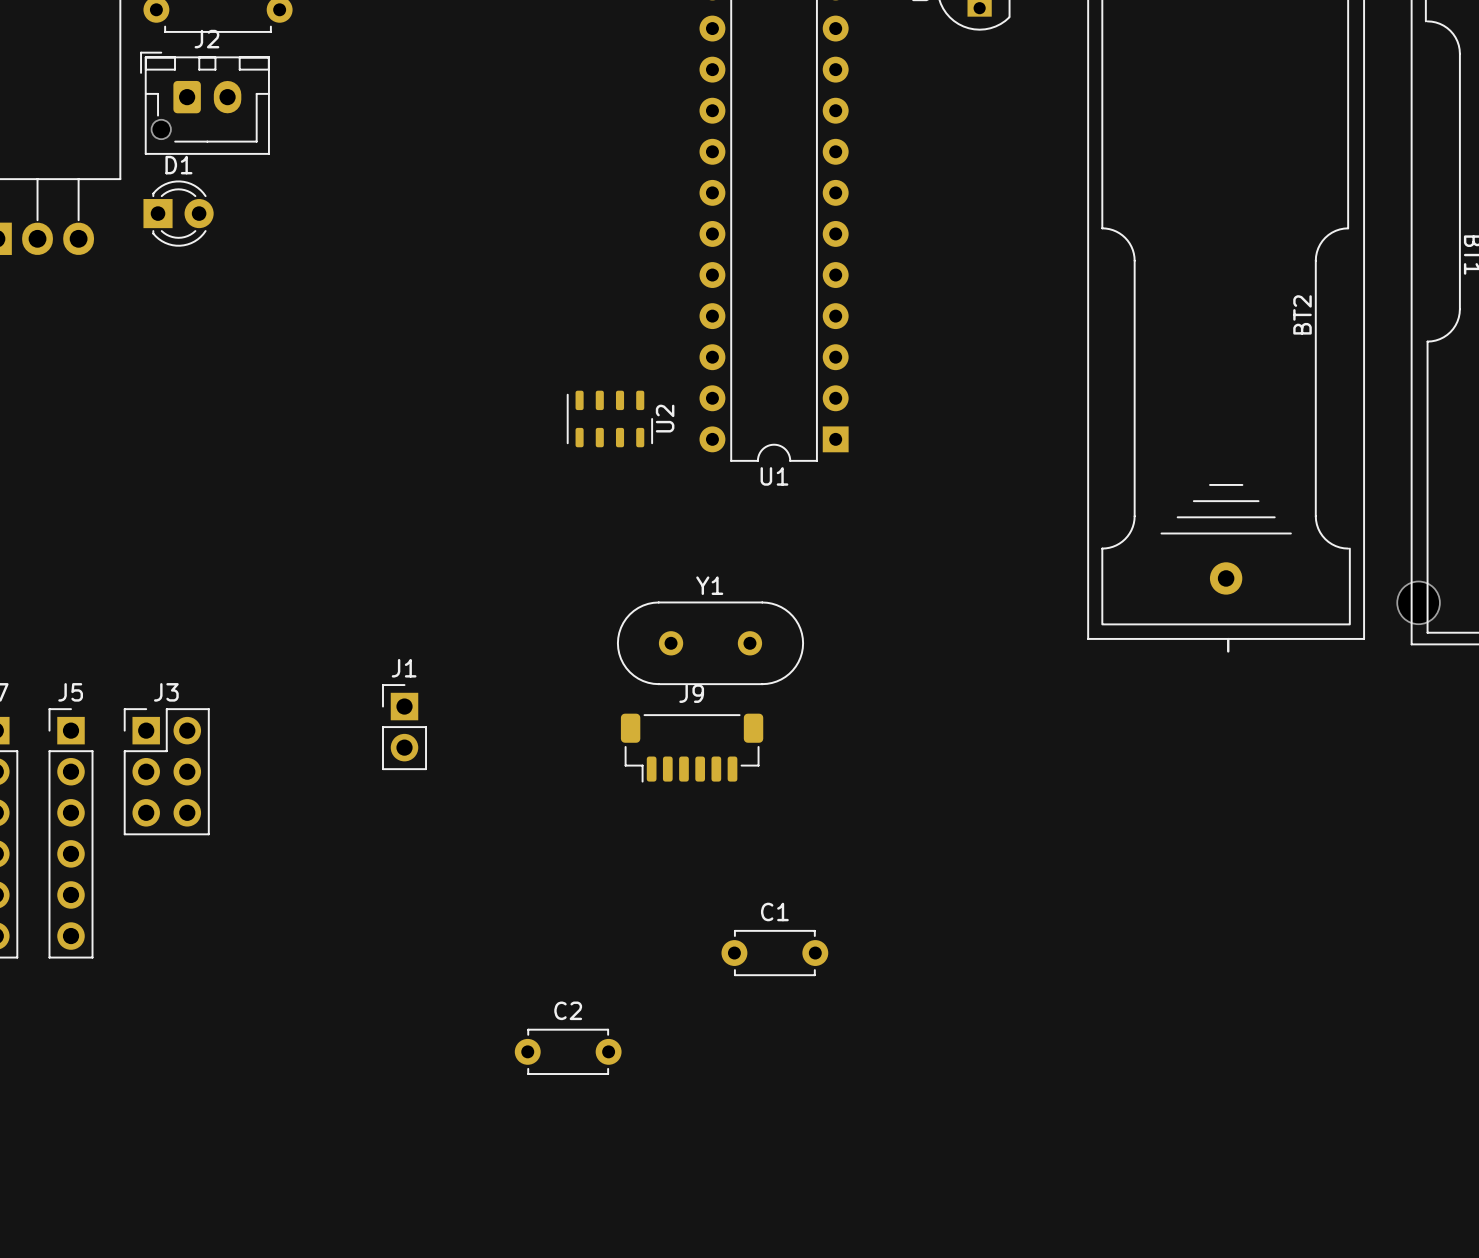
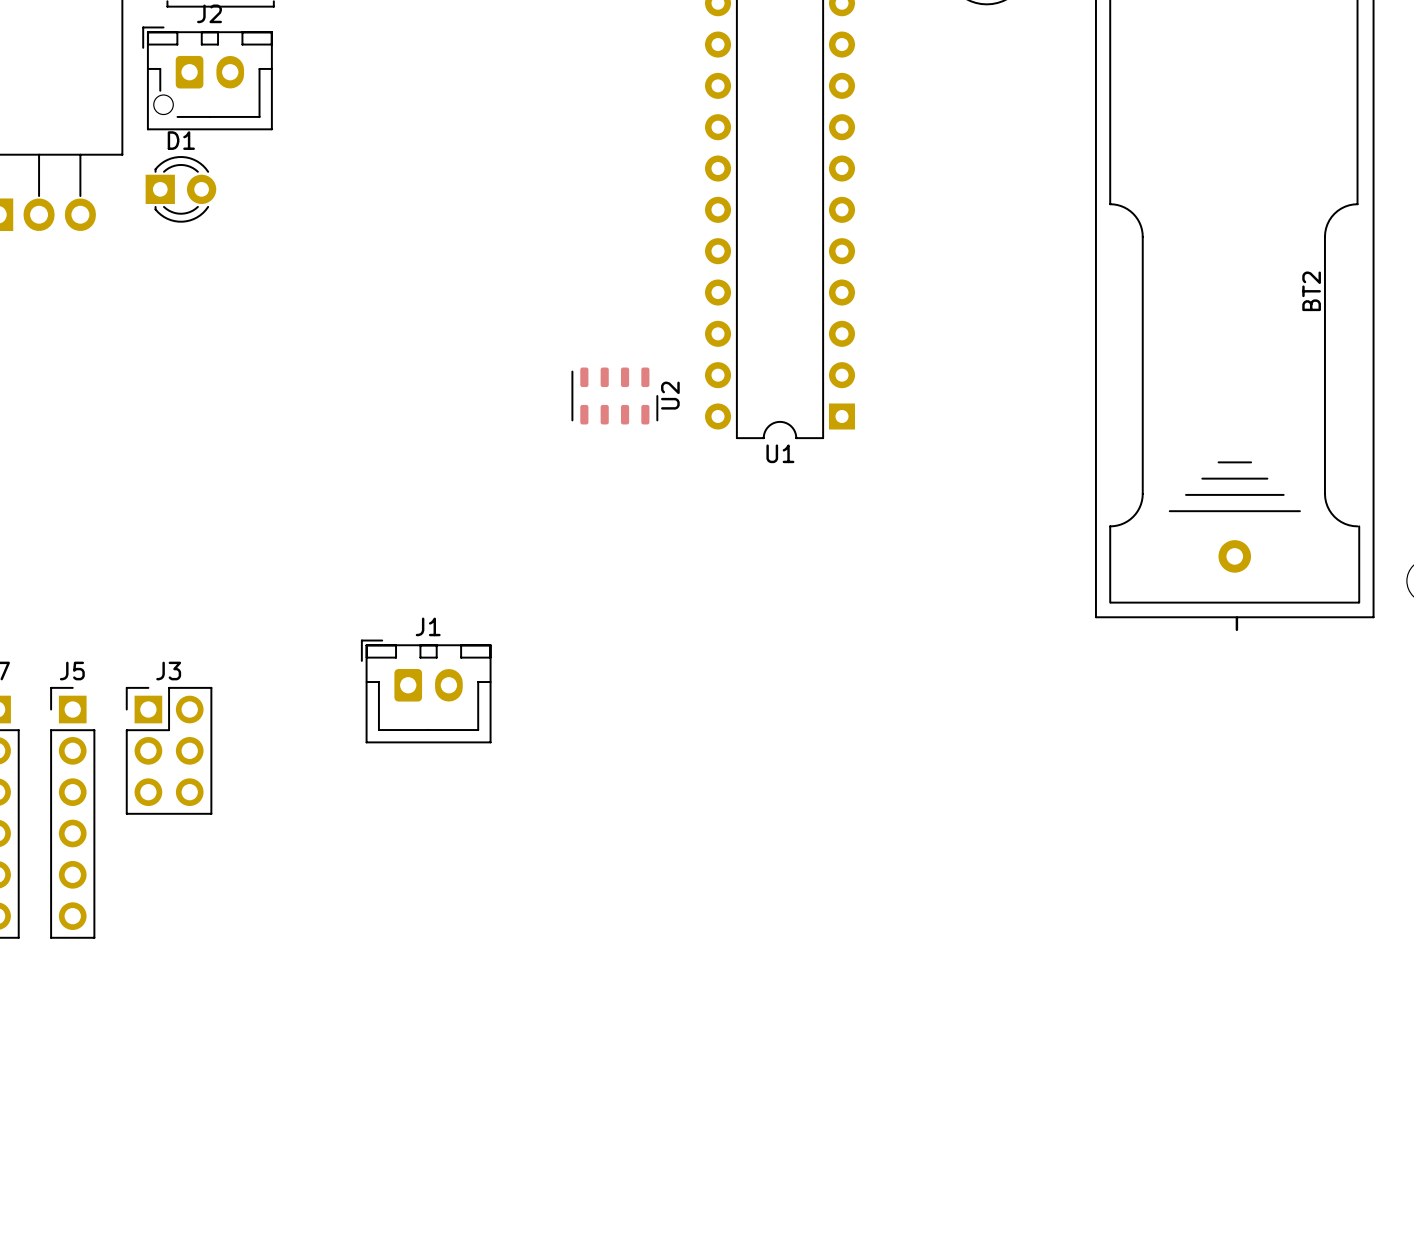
Y1: (710, 643) -> none
J1 footprint: [382, 684, 427, 771] -> [360, 639, 492, 744]
J9: (692, 748) -> none
C1: (774, 953) -> none
C2: (568, 1051) -> none

